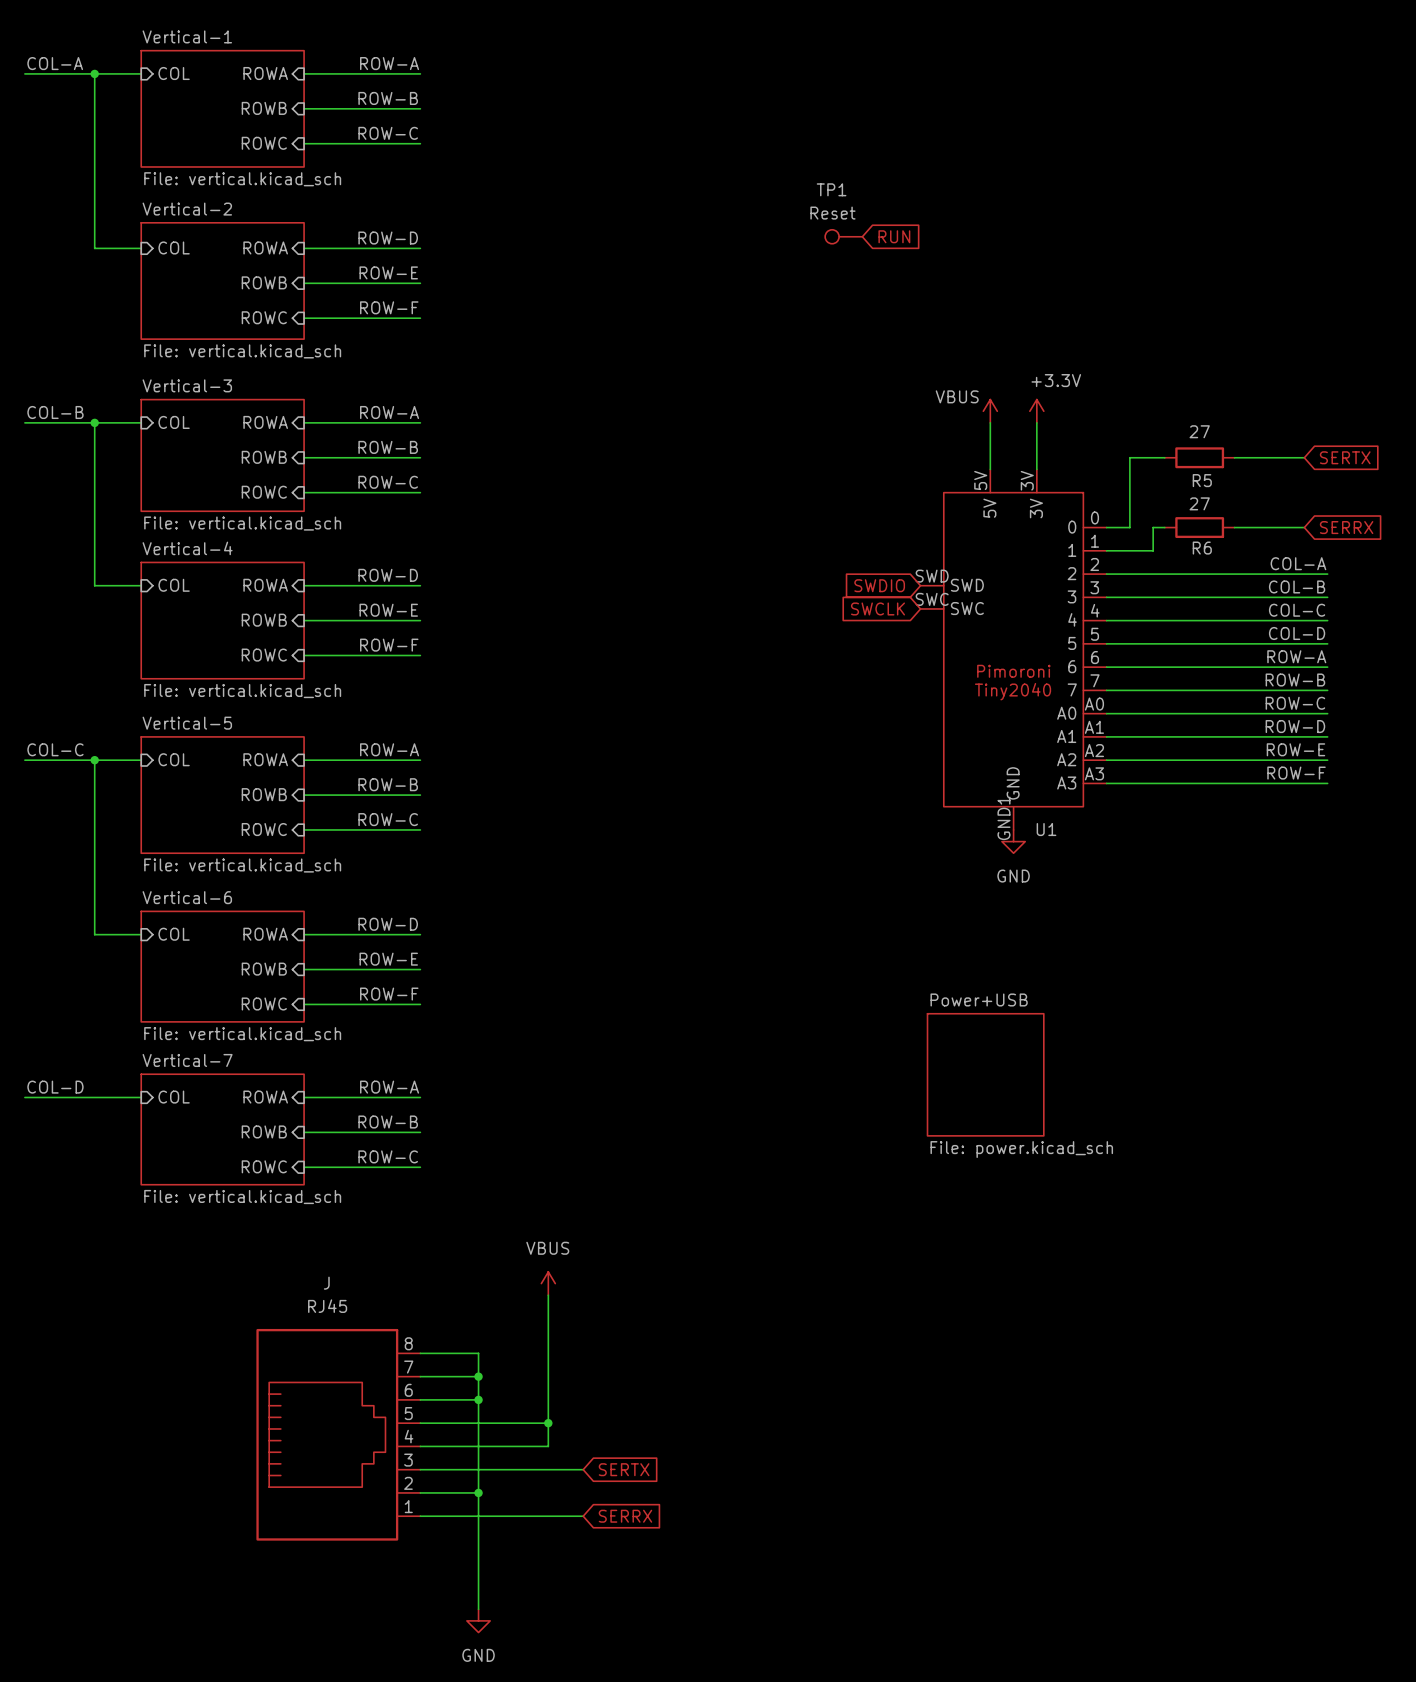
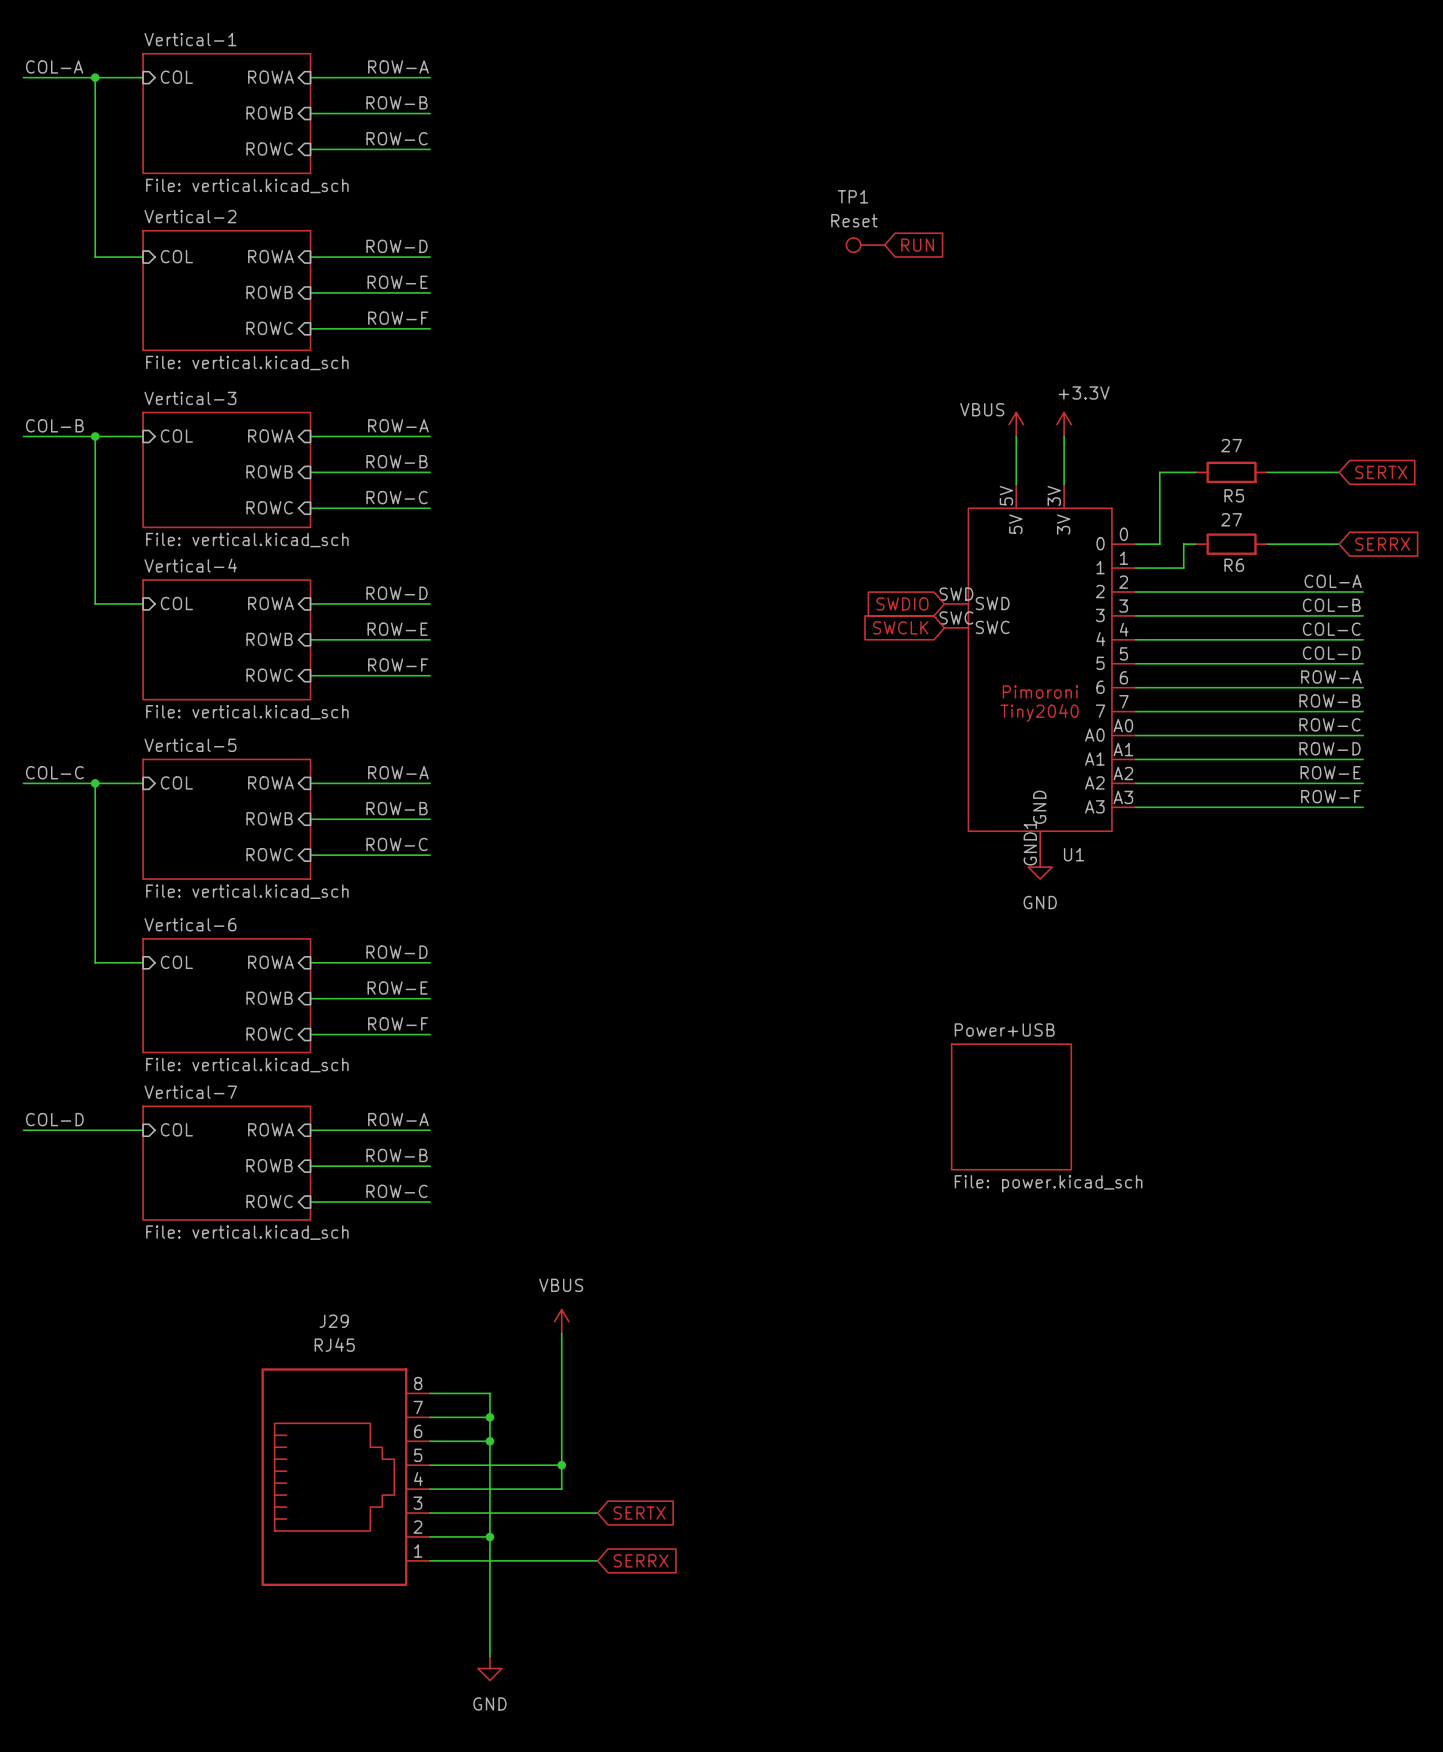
J name: J (326, 1283) -> J29 (334, 1321)

